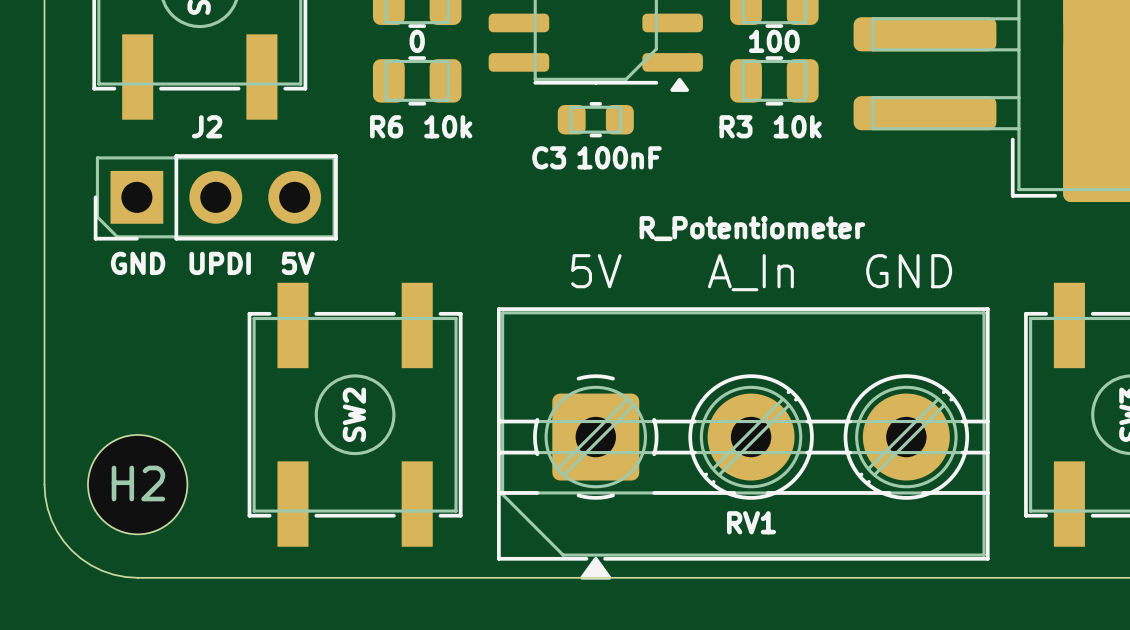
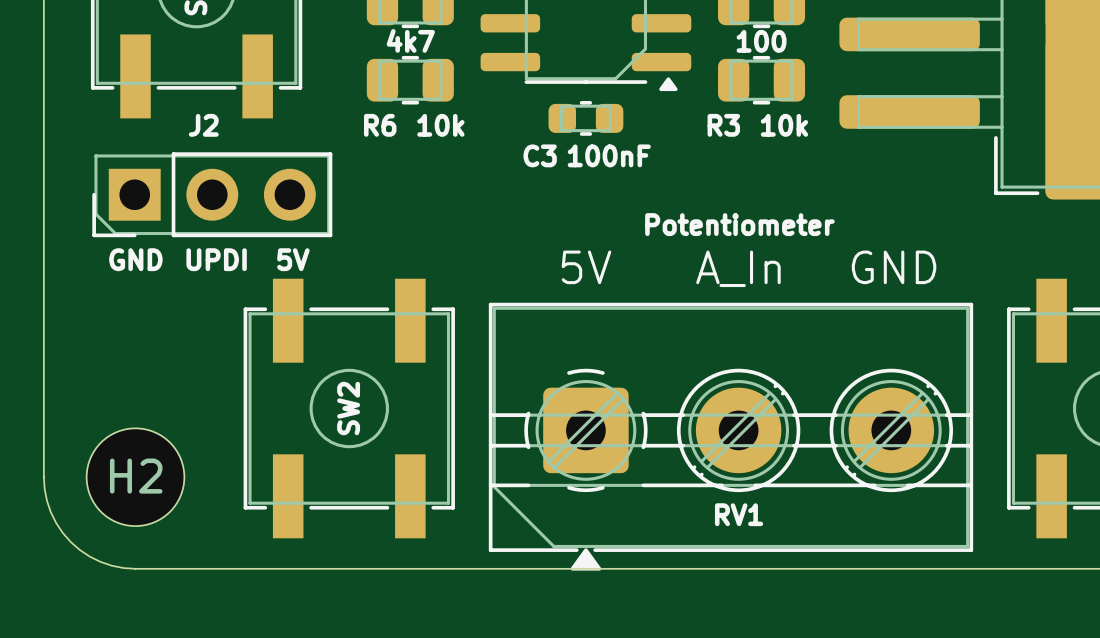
part value: 0 (417, 41) -> 4k7 (410, 40)
RV1 value: R_Potentiometer (752, 228) -> Potentiometer (739, 224)

